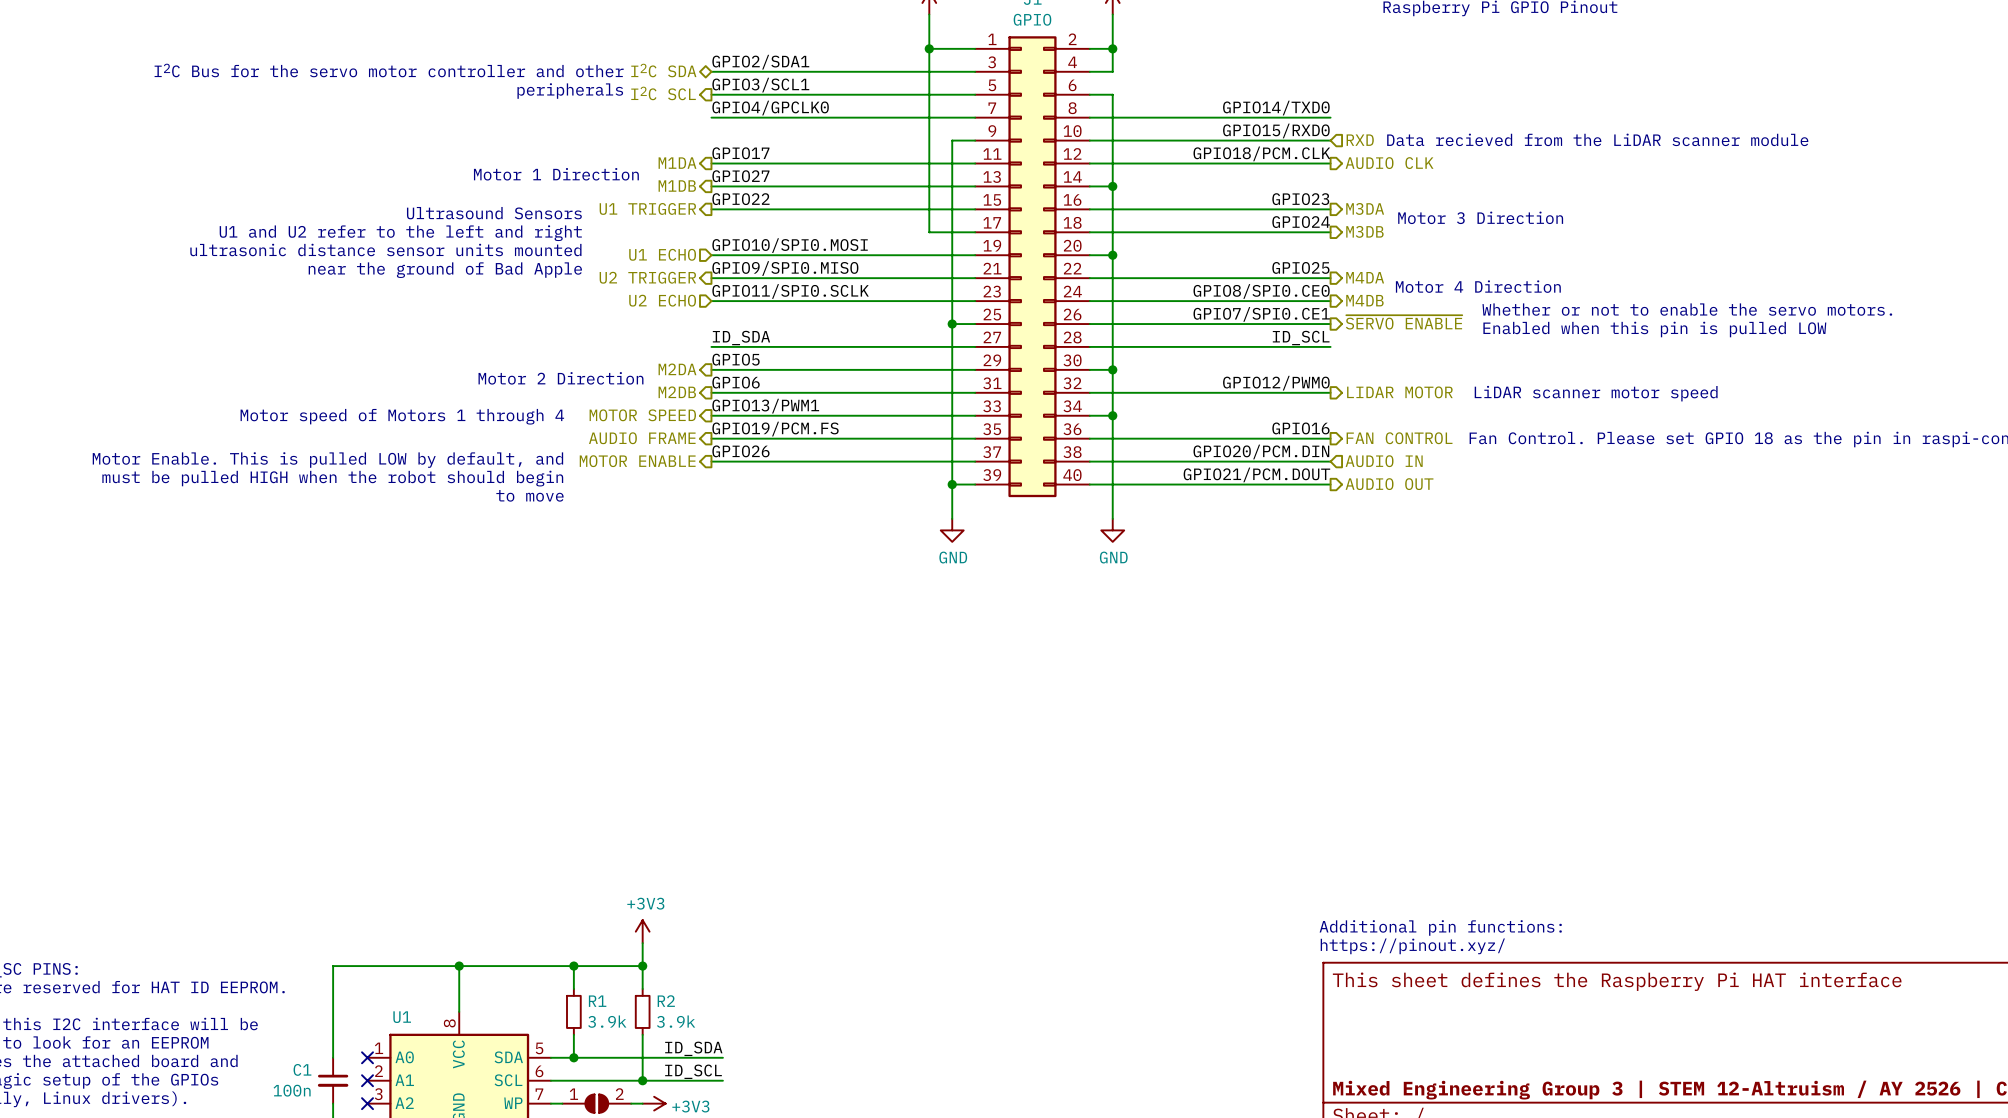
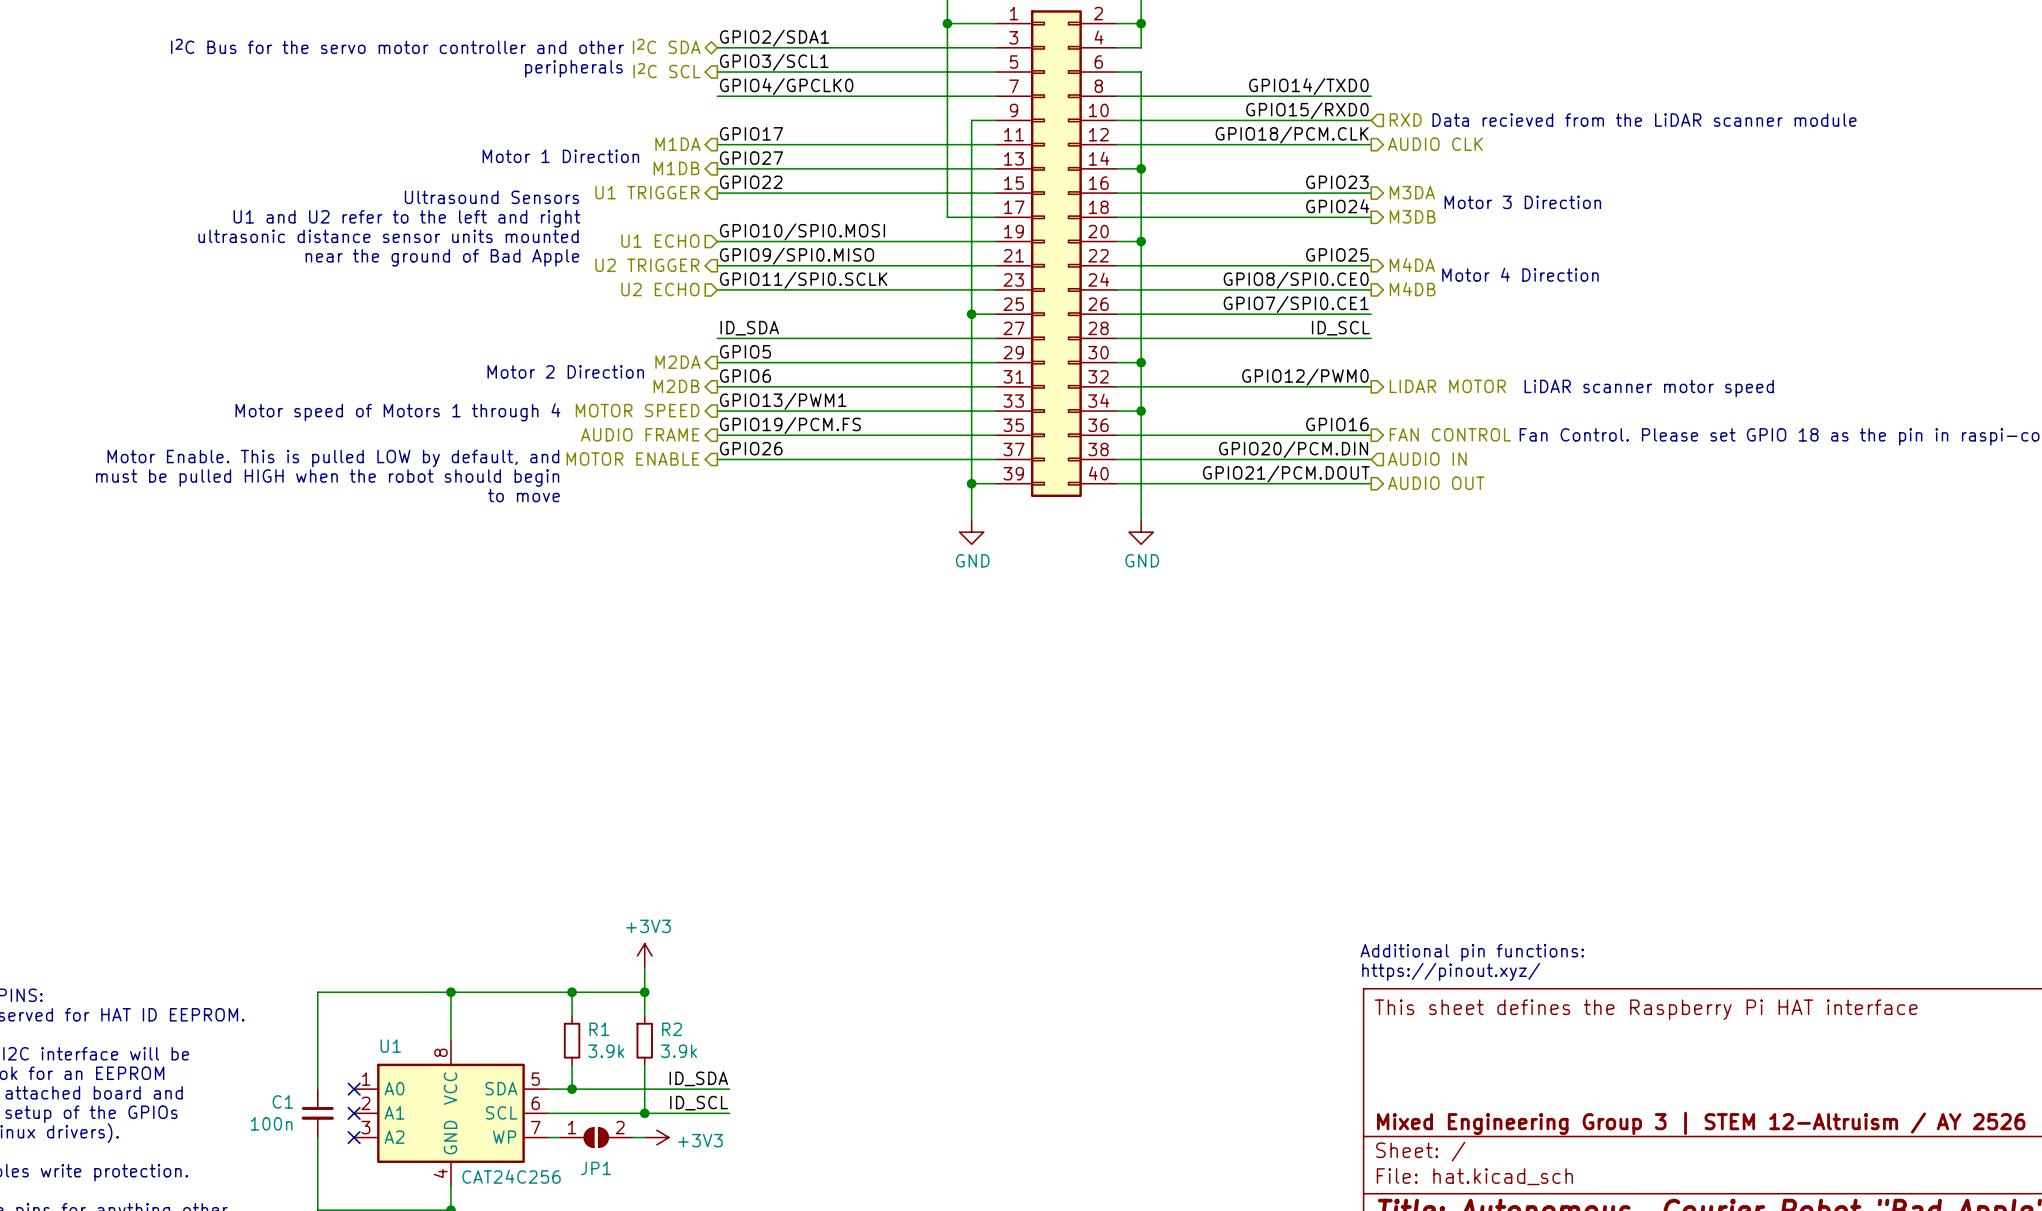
text: Whether or not to enable the servo motors. (1687, 309) -> none
hierarchical label: ~{SERVO ENABLE} (1404, 322) -> none
text: Enabled when this pin is pulled LOW (1654, 329) -> none

